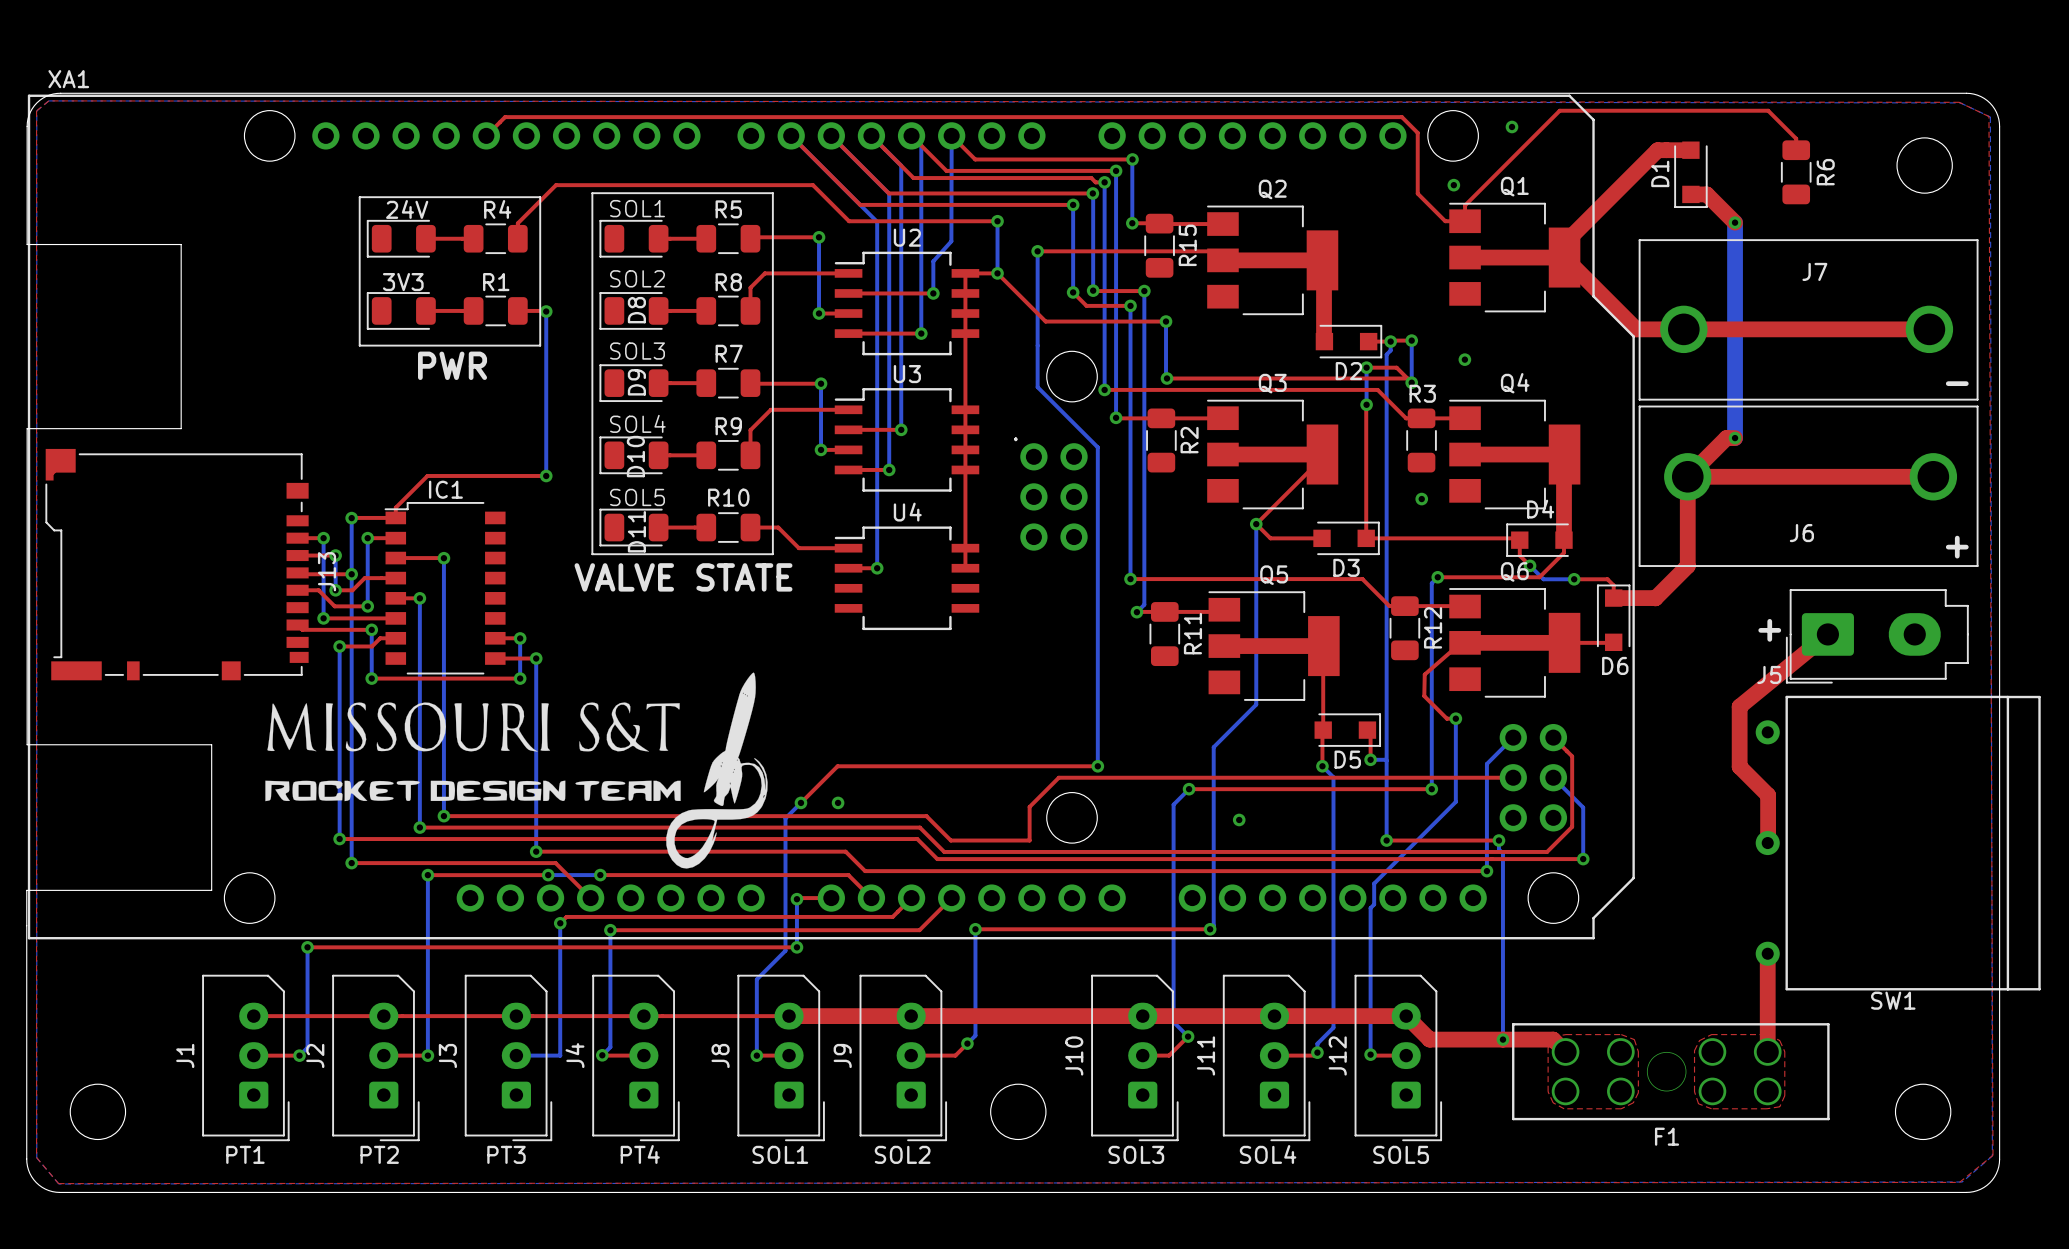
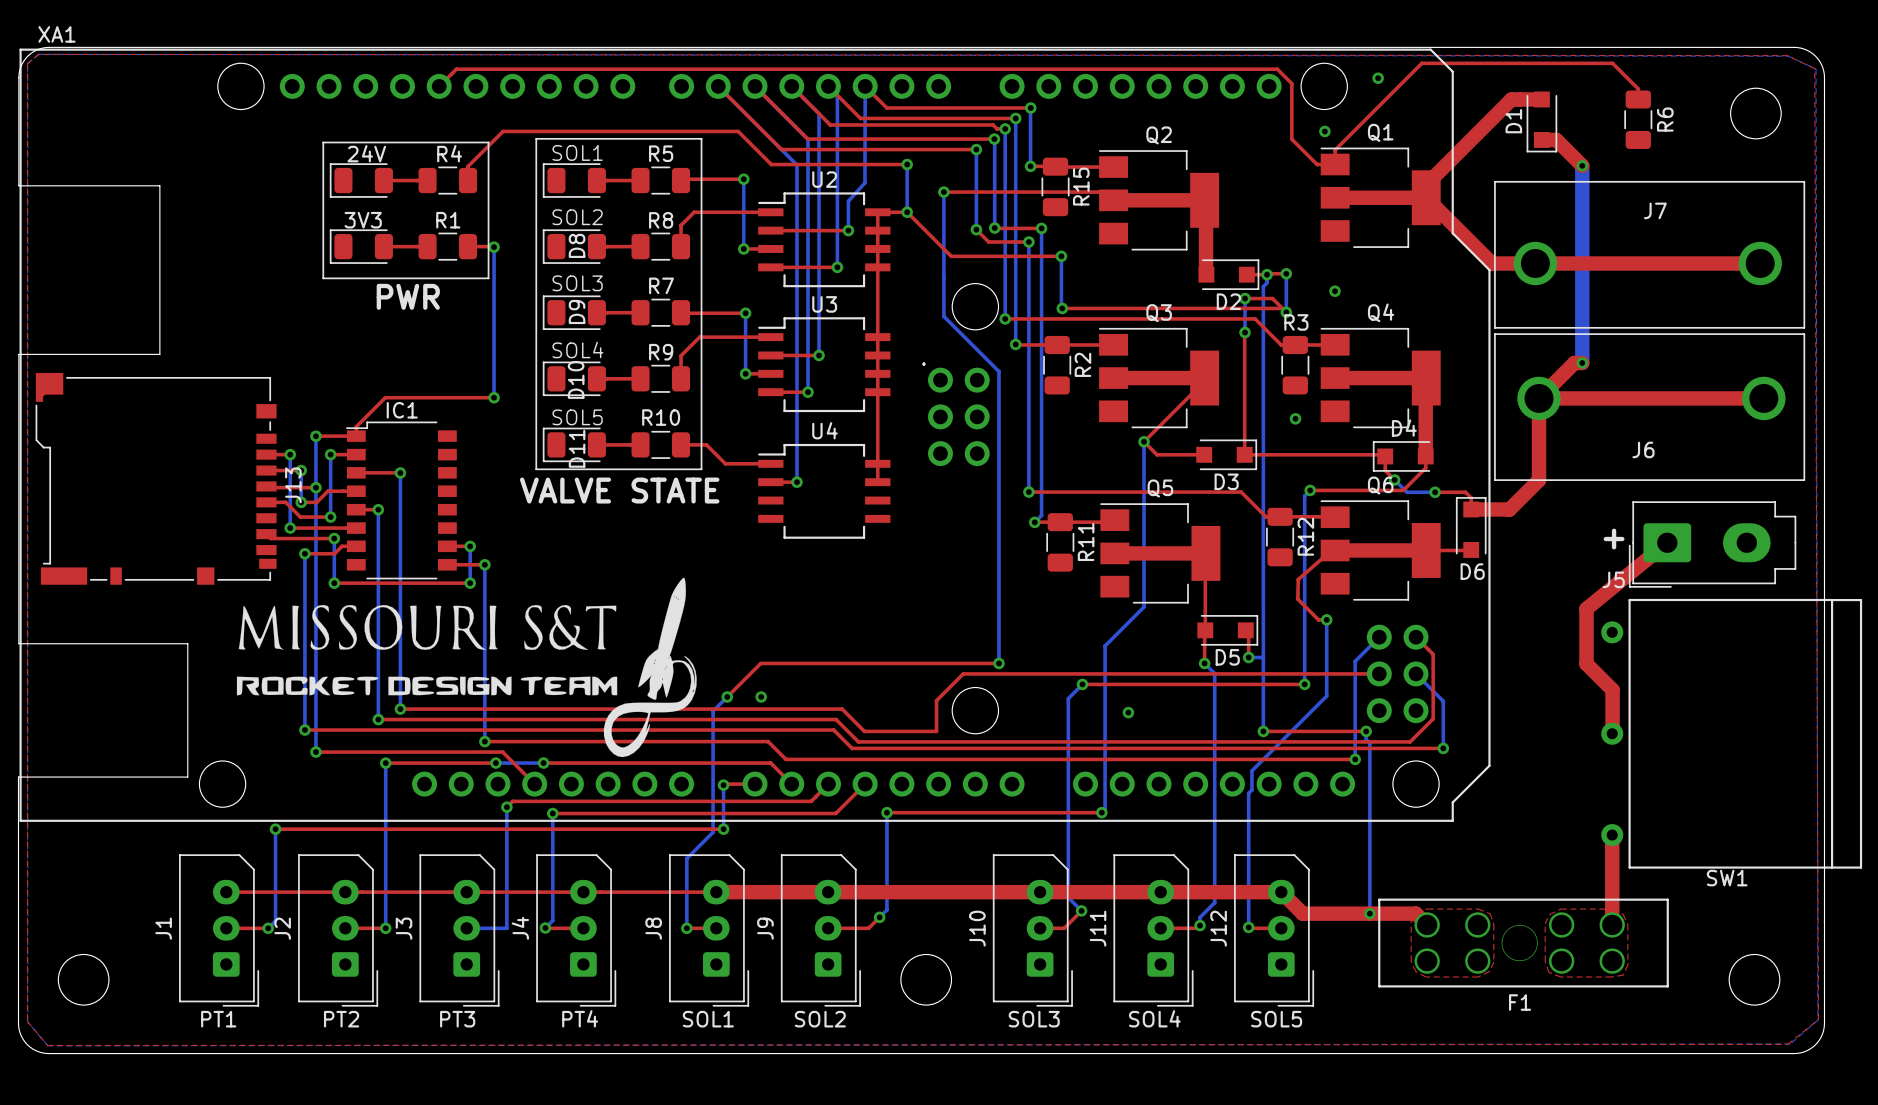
text: - (1957, 383) -> none
text: + (1957, 547) -> none

